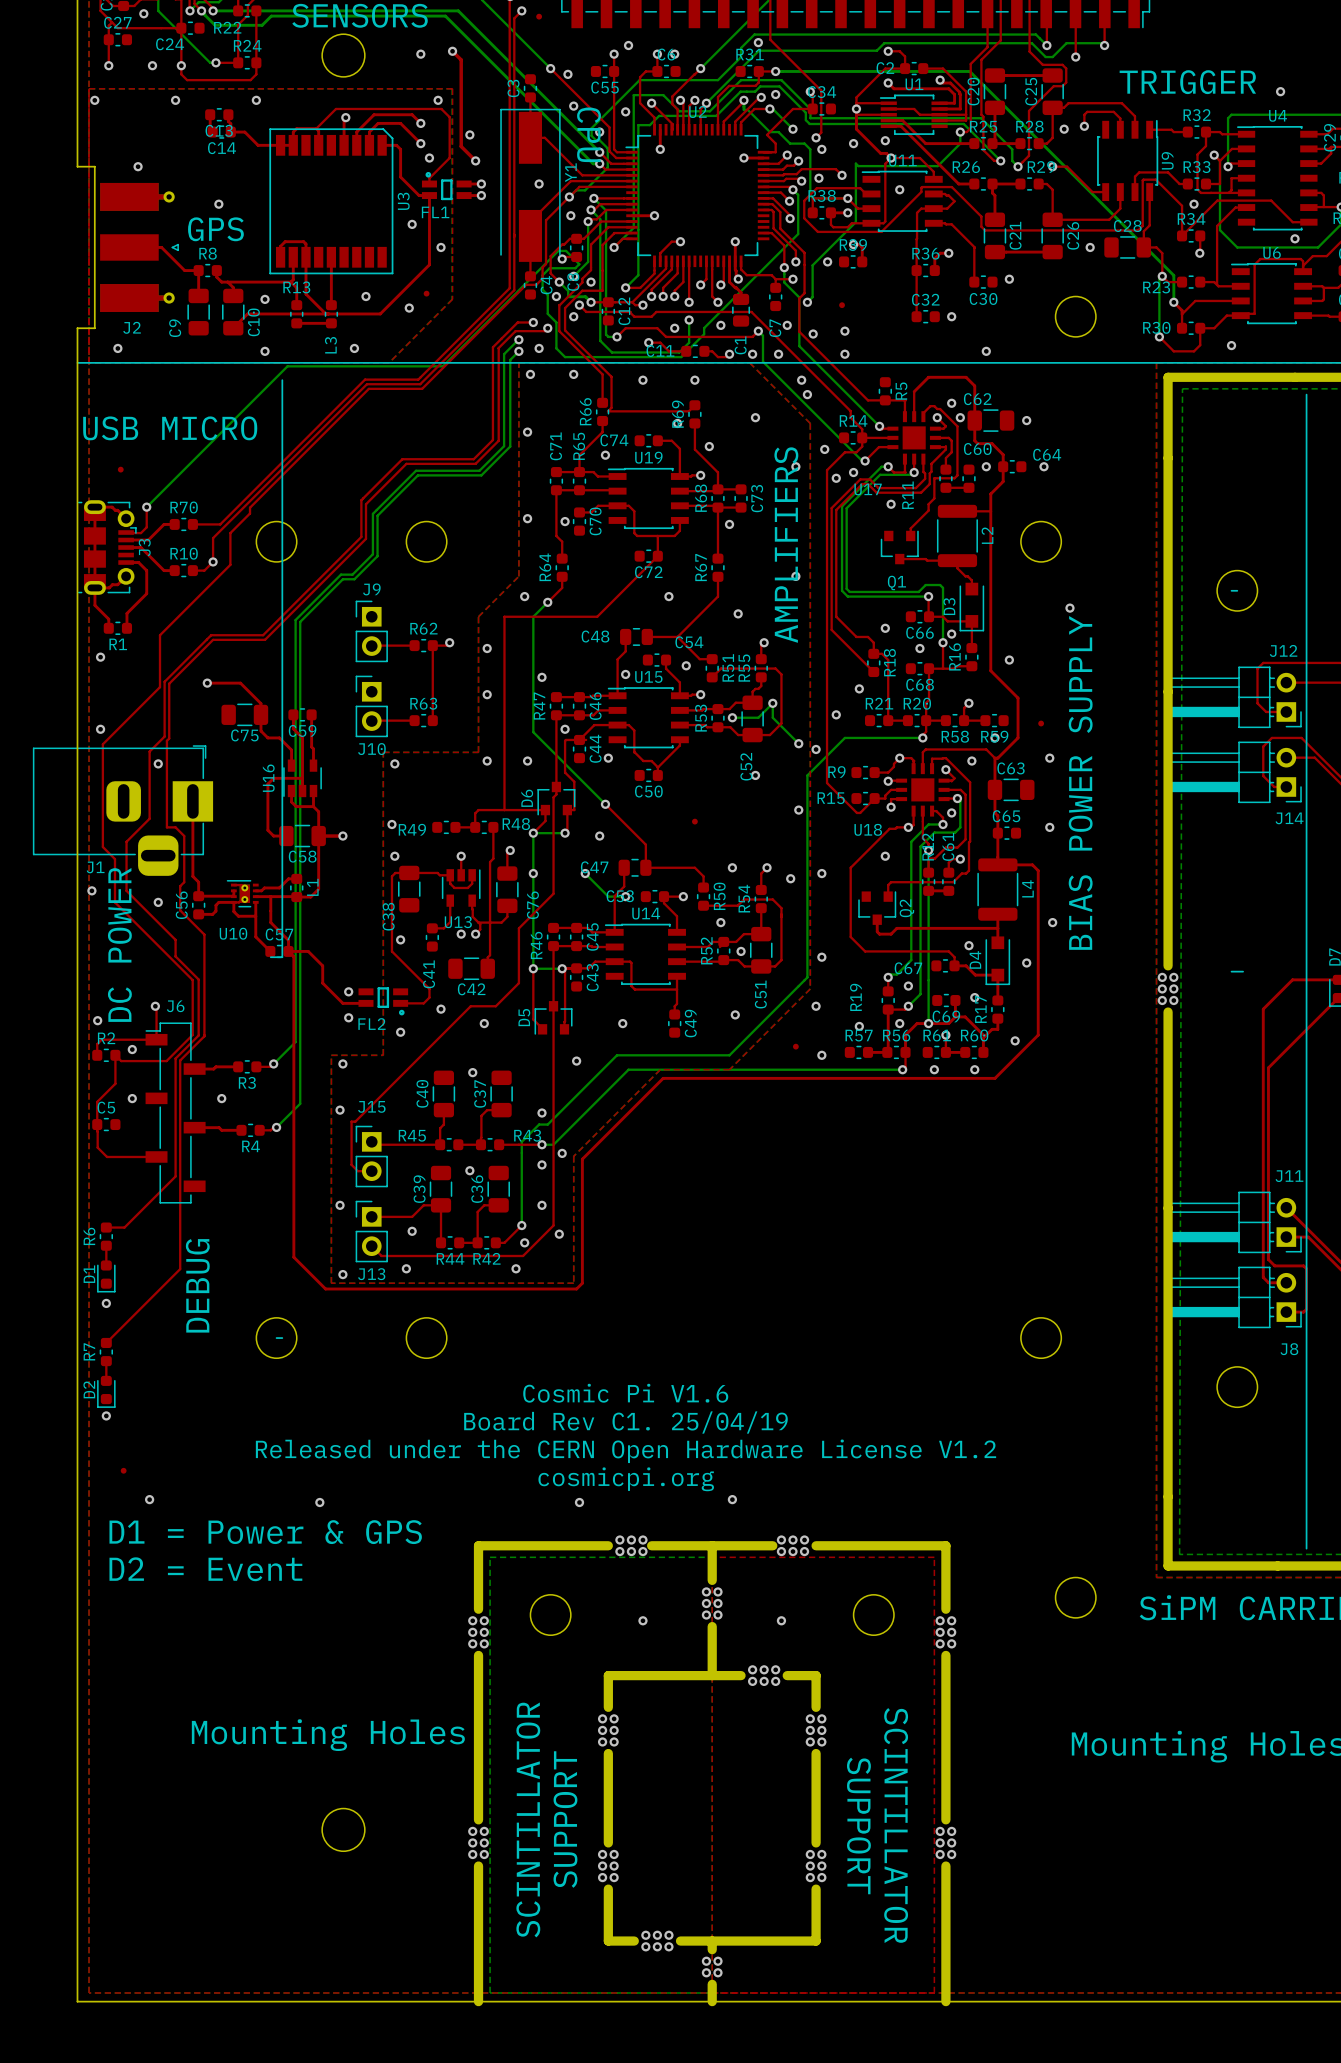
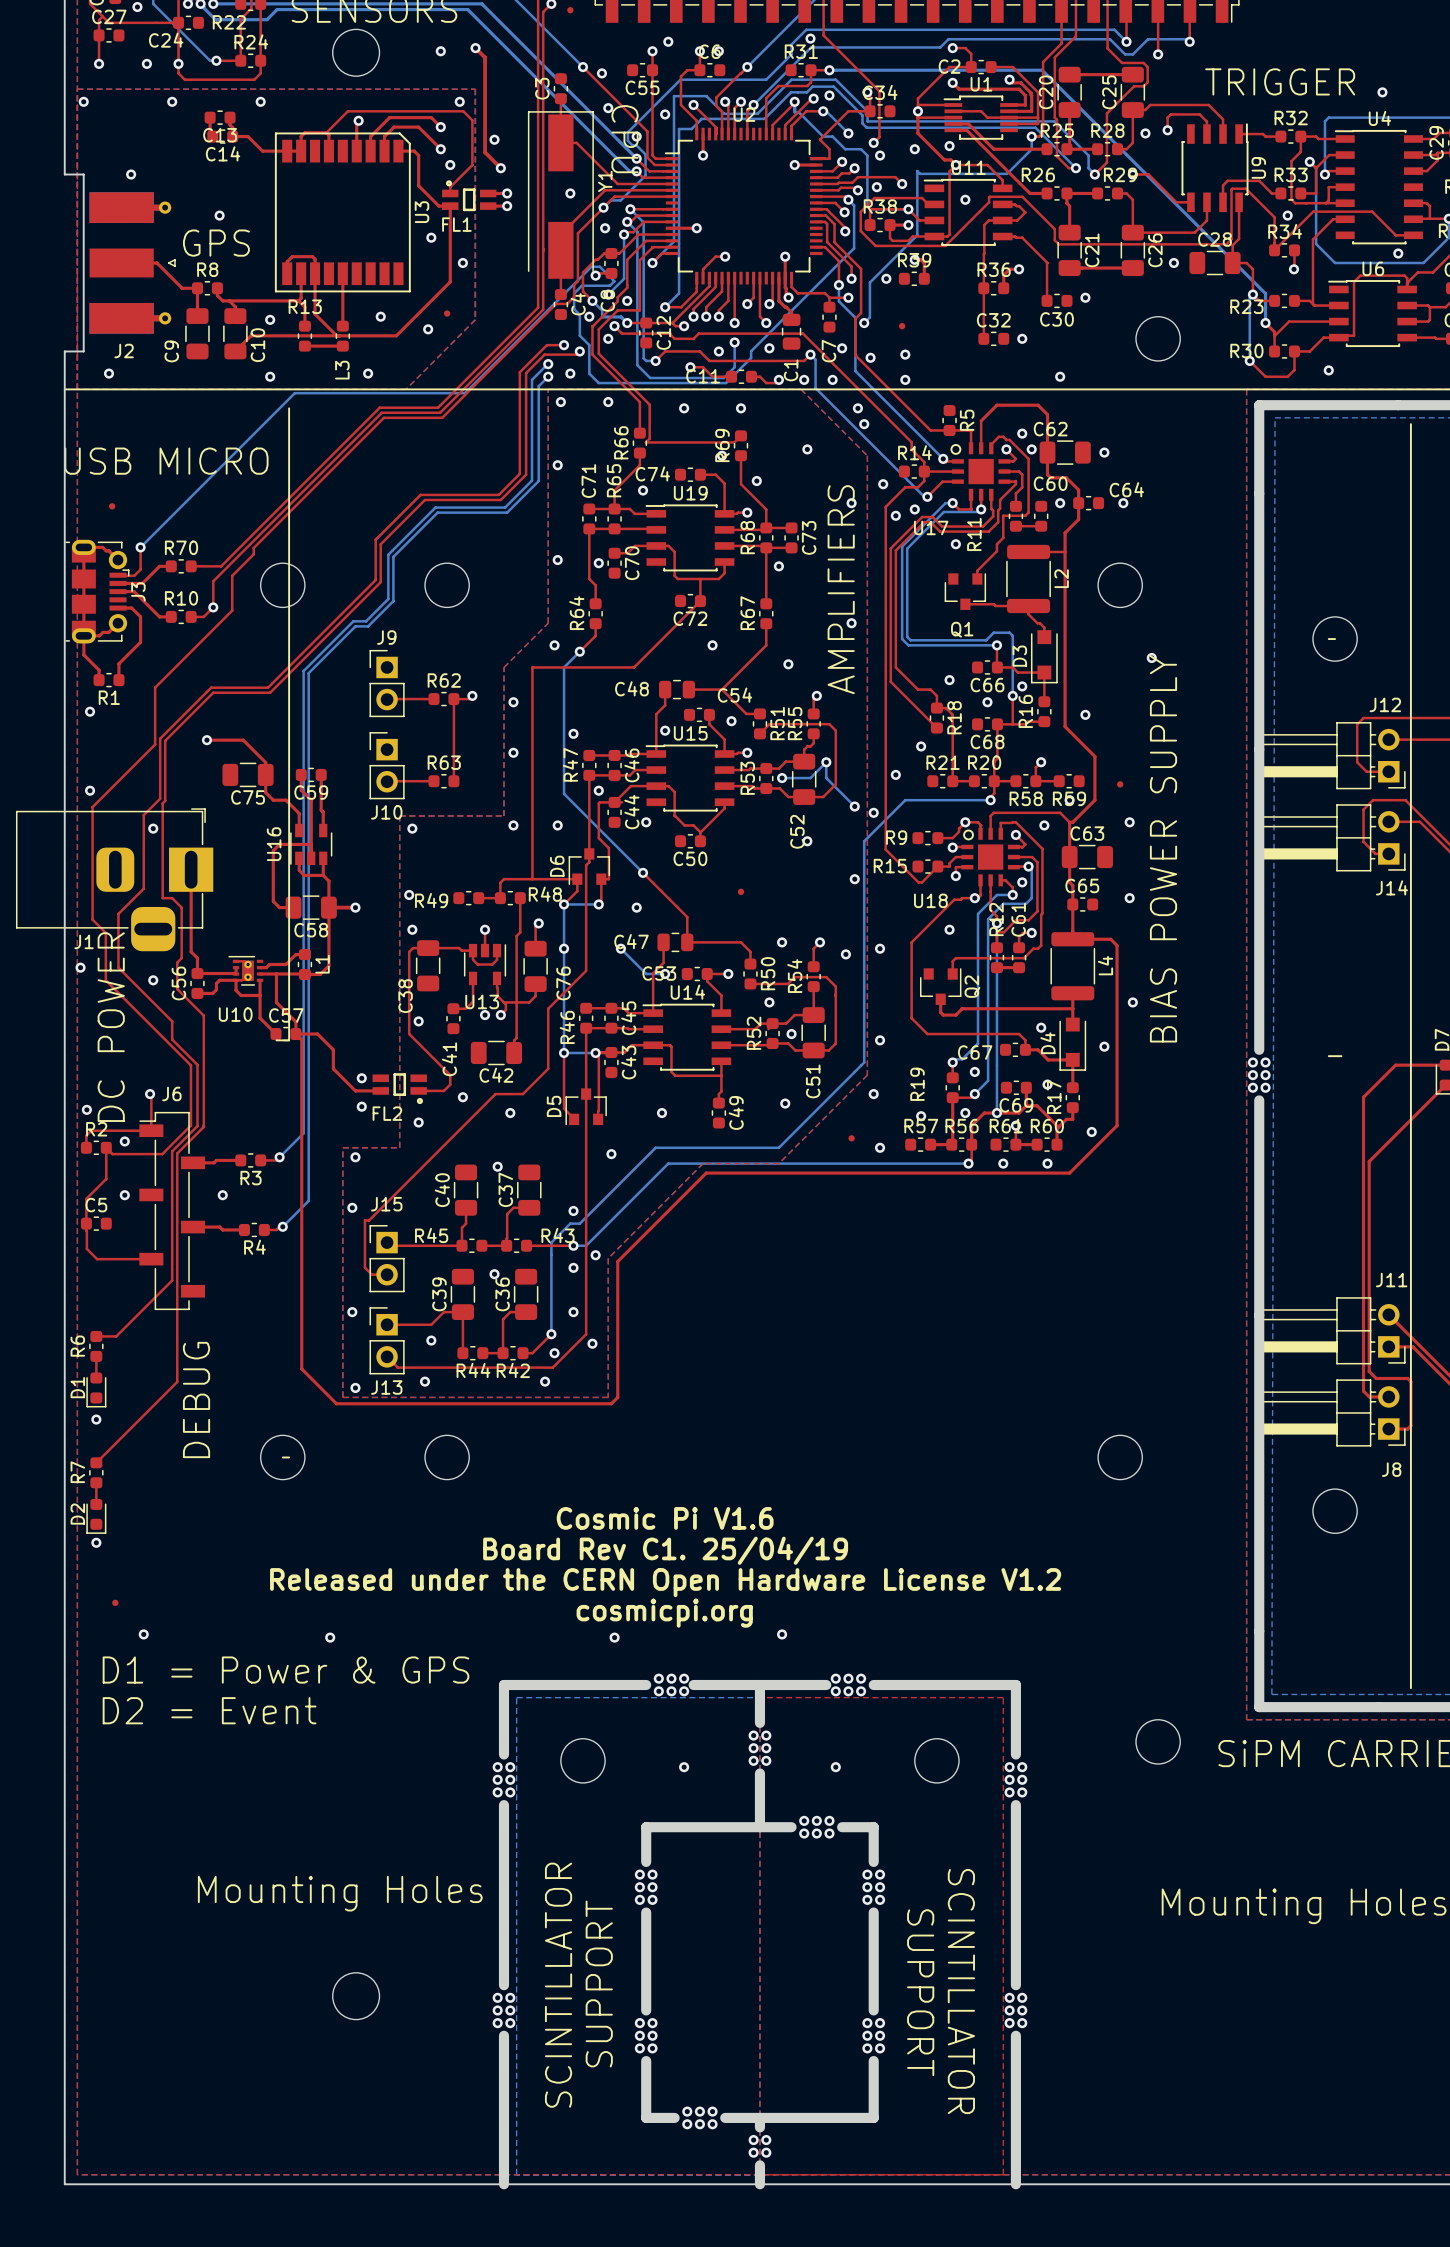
drawing: none -> [950, 444, 962, 455]
drawing: none -> [963, 829, 974, 841]

